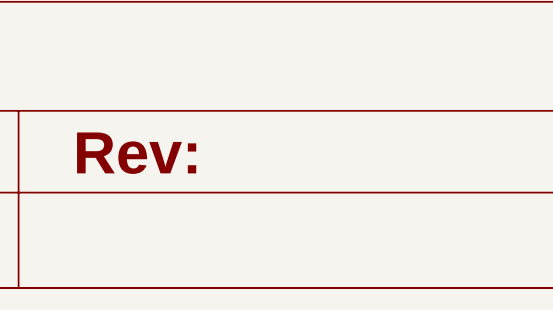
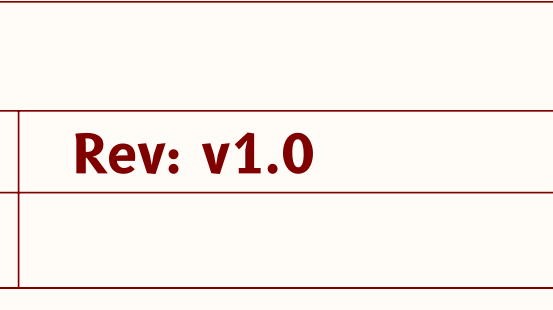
title block: Rev: (136, 153) -> Rev: v1.0 (194, 153)

